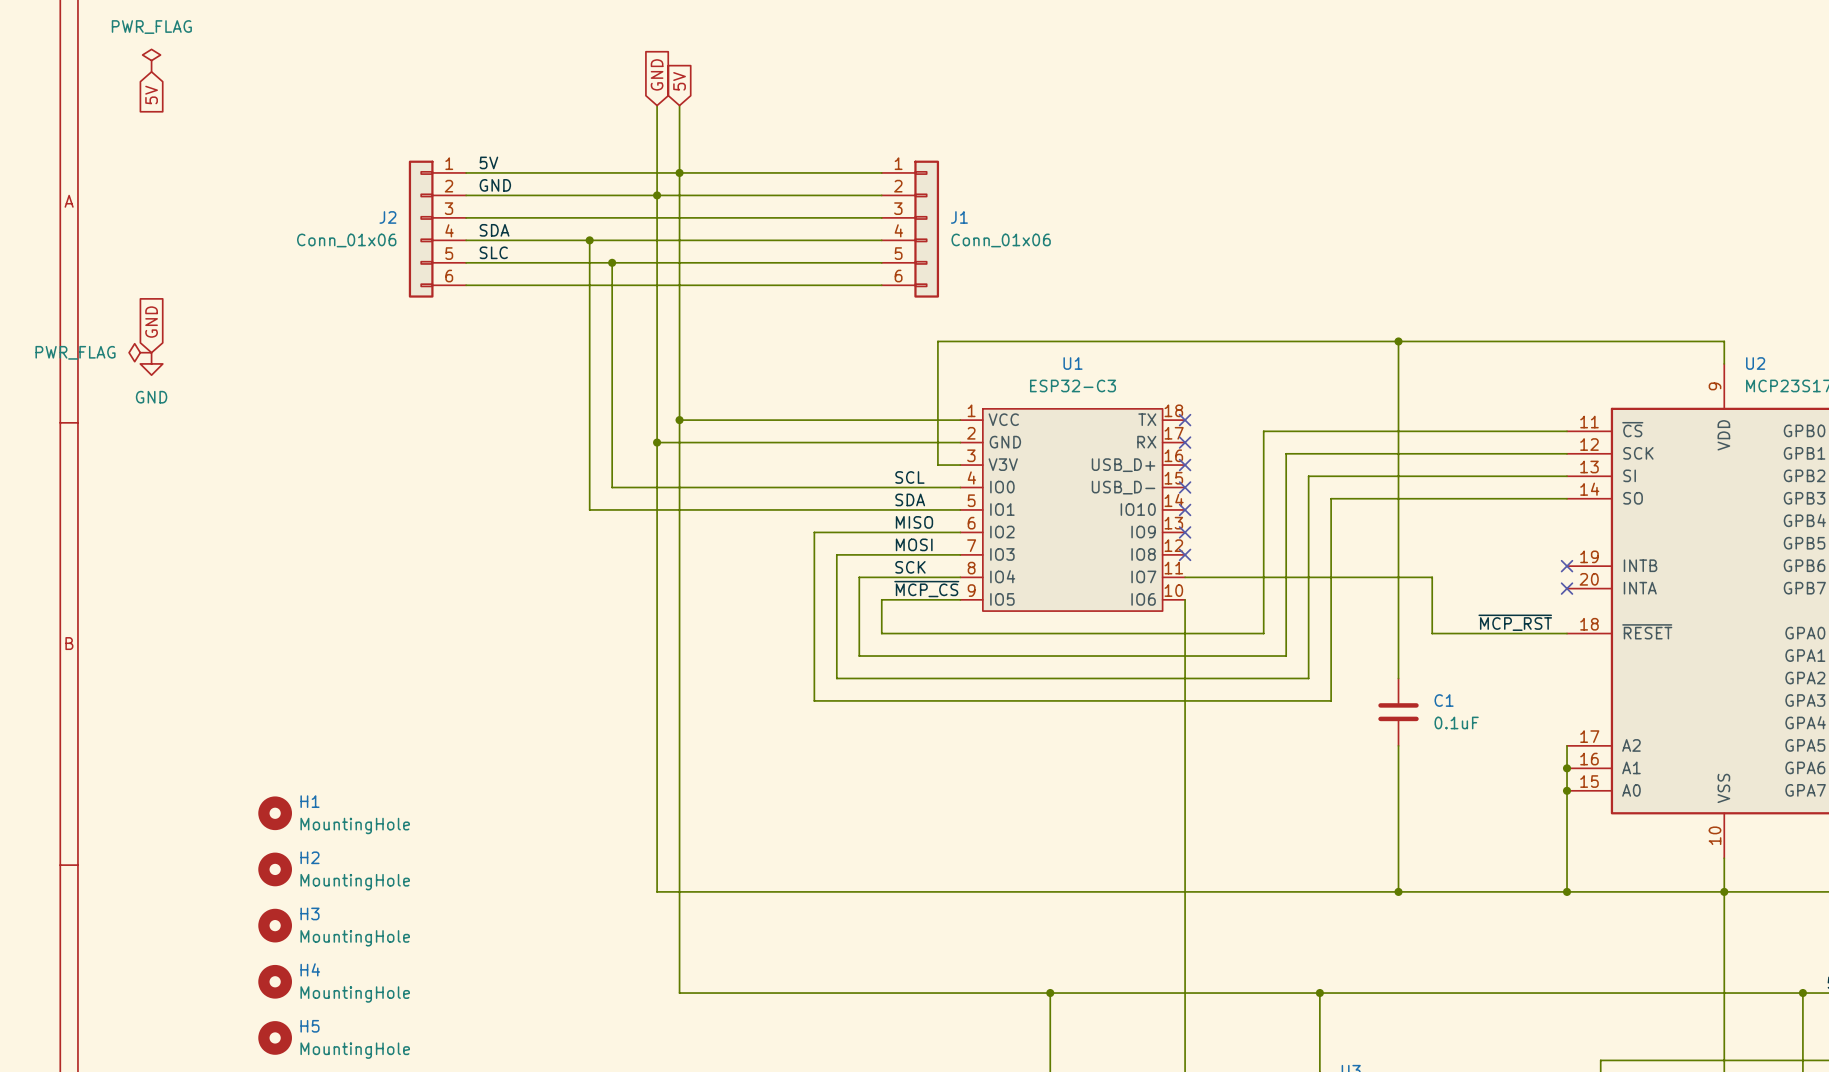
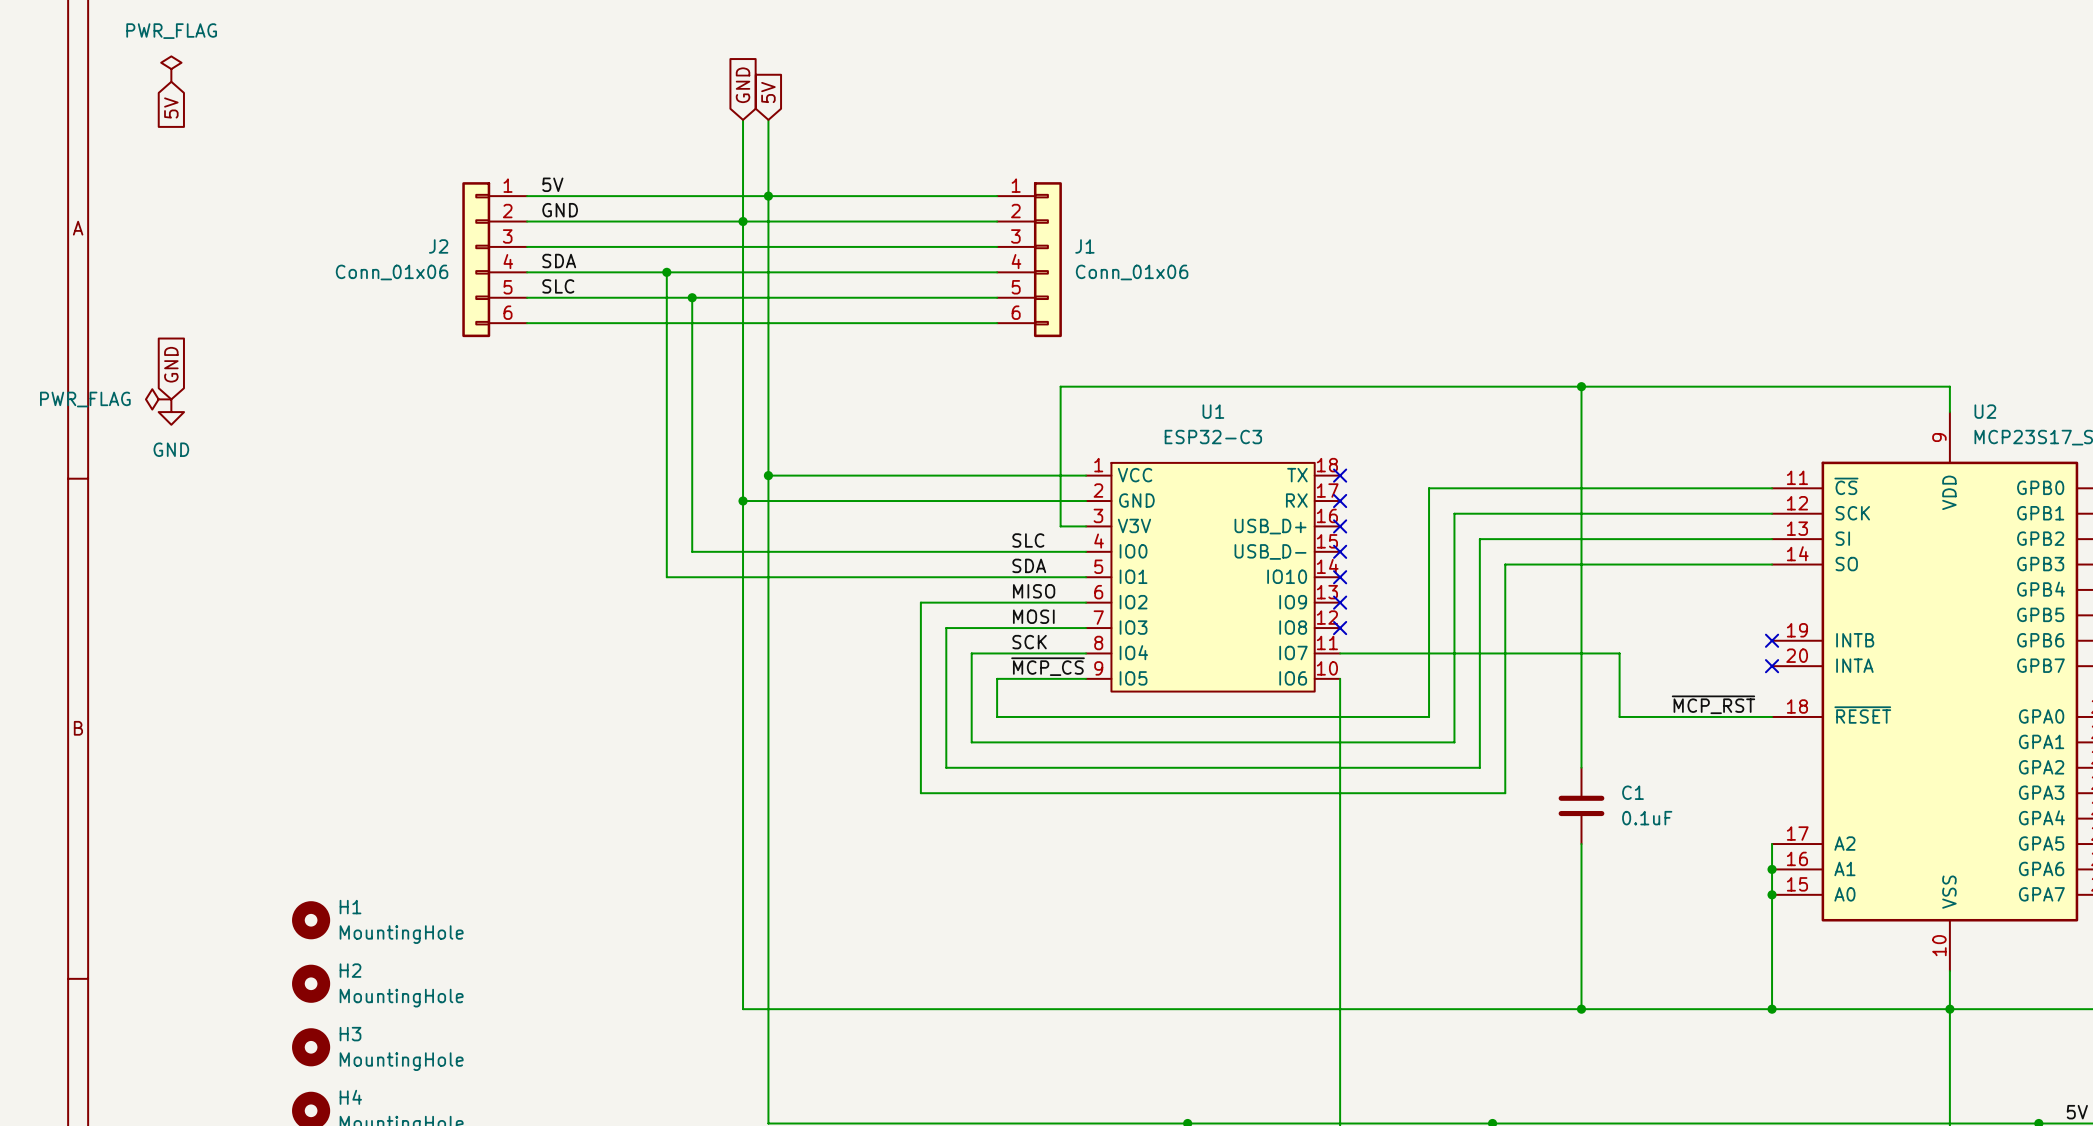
label: SCL (909, 477) -> SLC (1028, 540)

